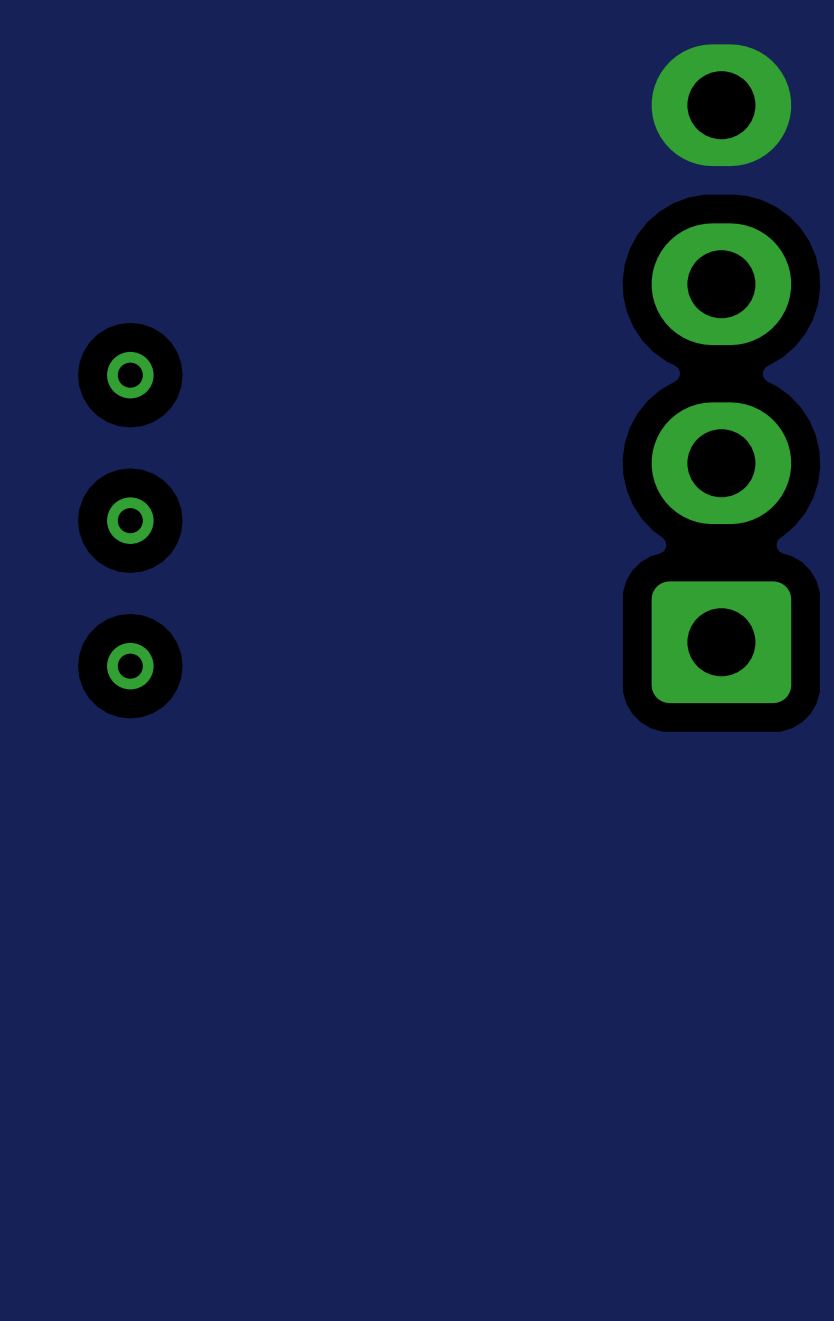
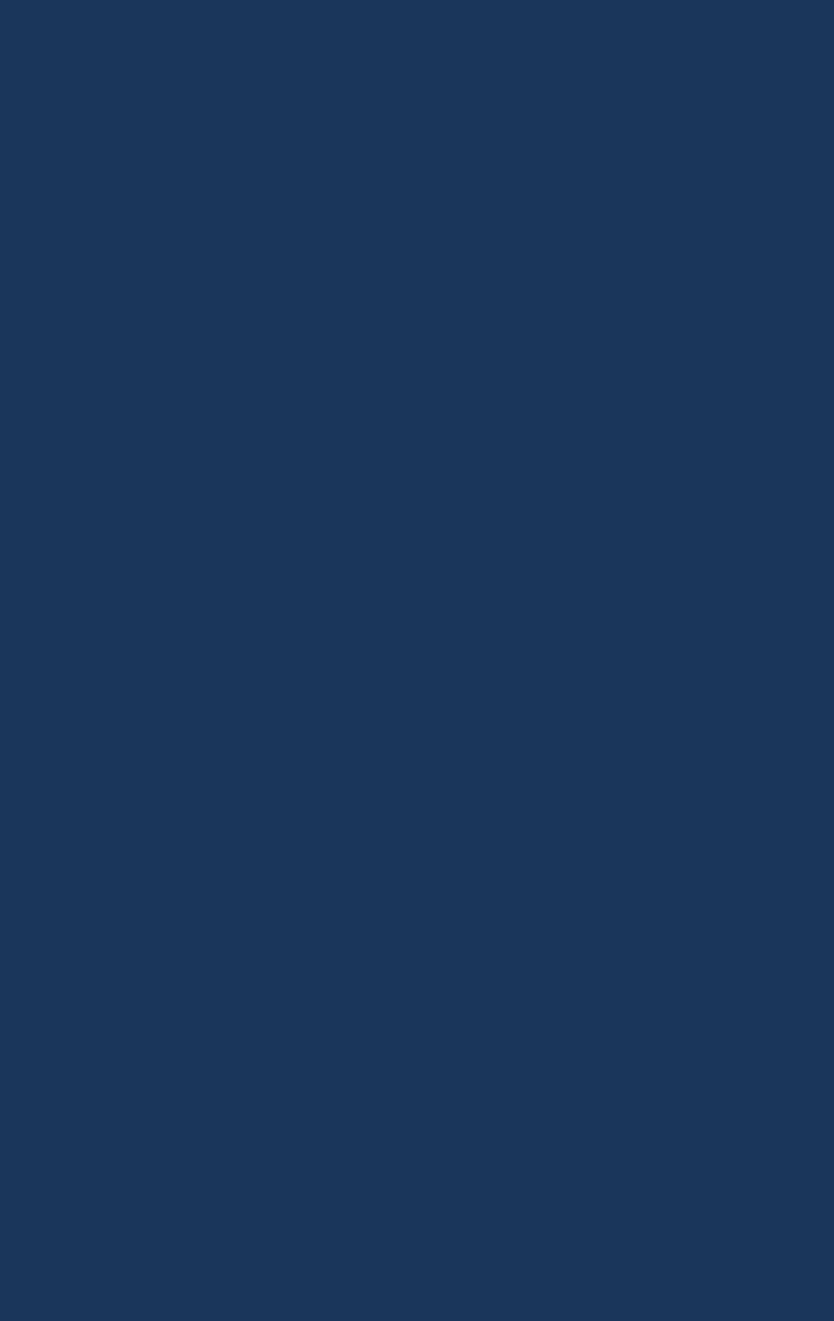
part: (721, 373) -> none
via: (130, 375) -> none
via: (130, 520) -> none
via: (130, 666) -> none

